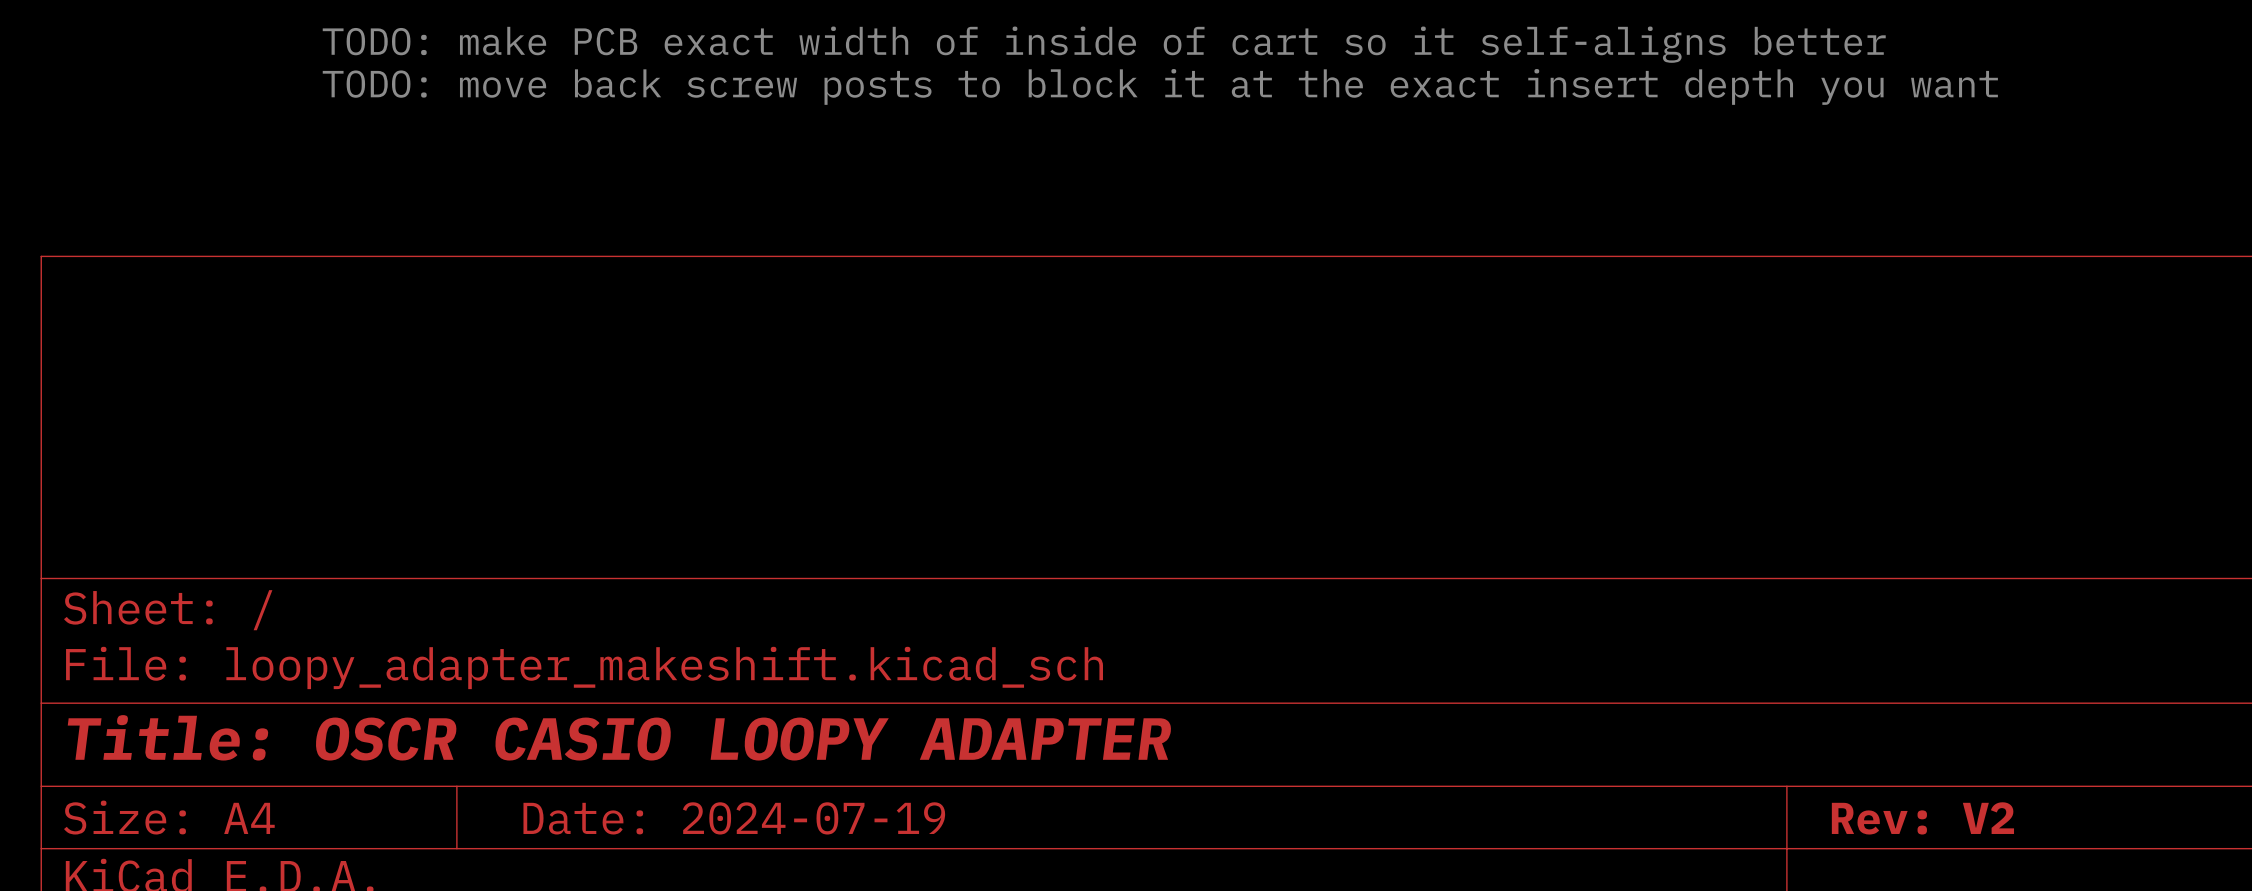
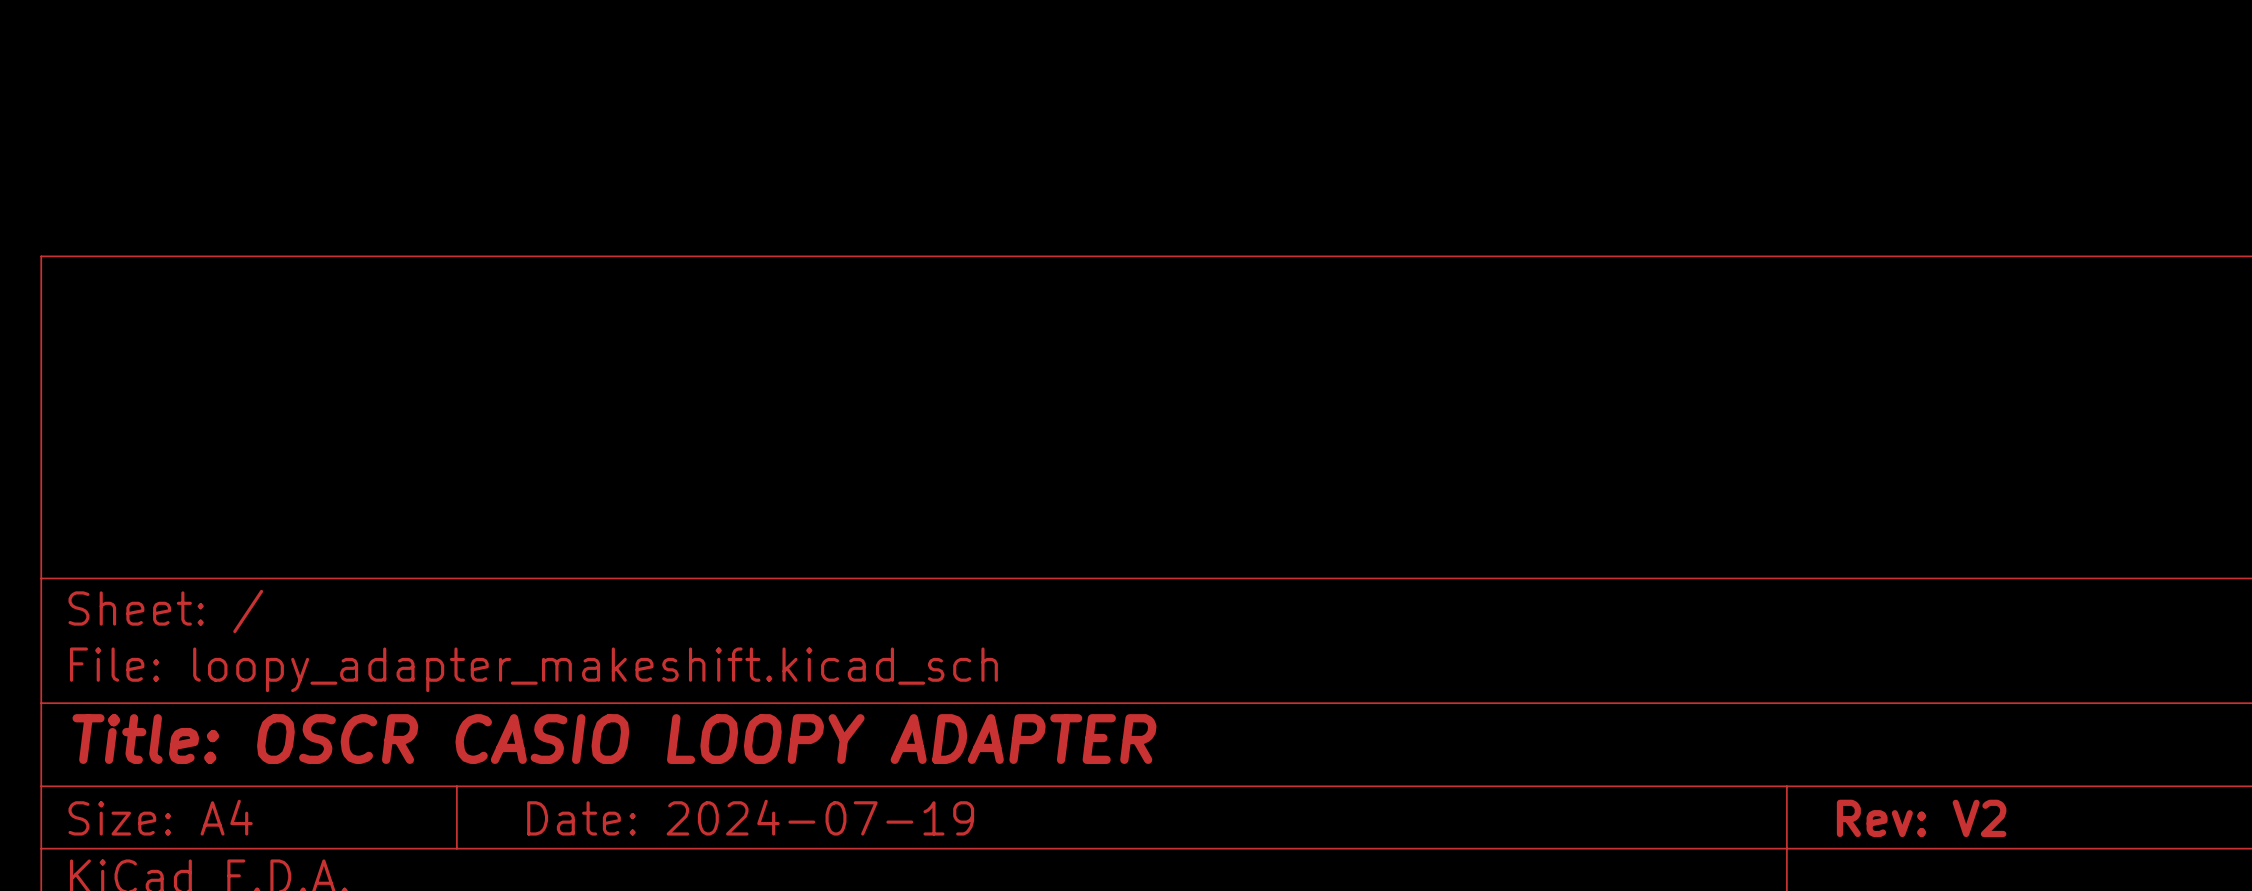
text: TODO: make PCB exact width of inside of cart so it self-aligns better (1104, 44) -> none
text: TODO: move back screw posts to block it at the exact insert depth you want (1160, 86) -> none

